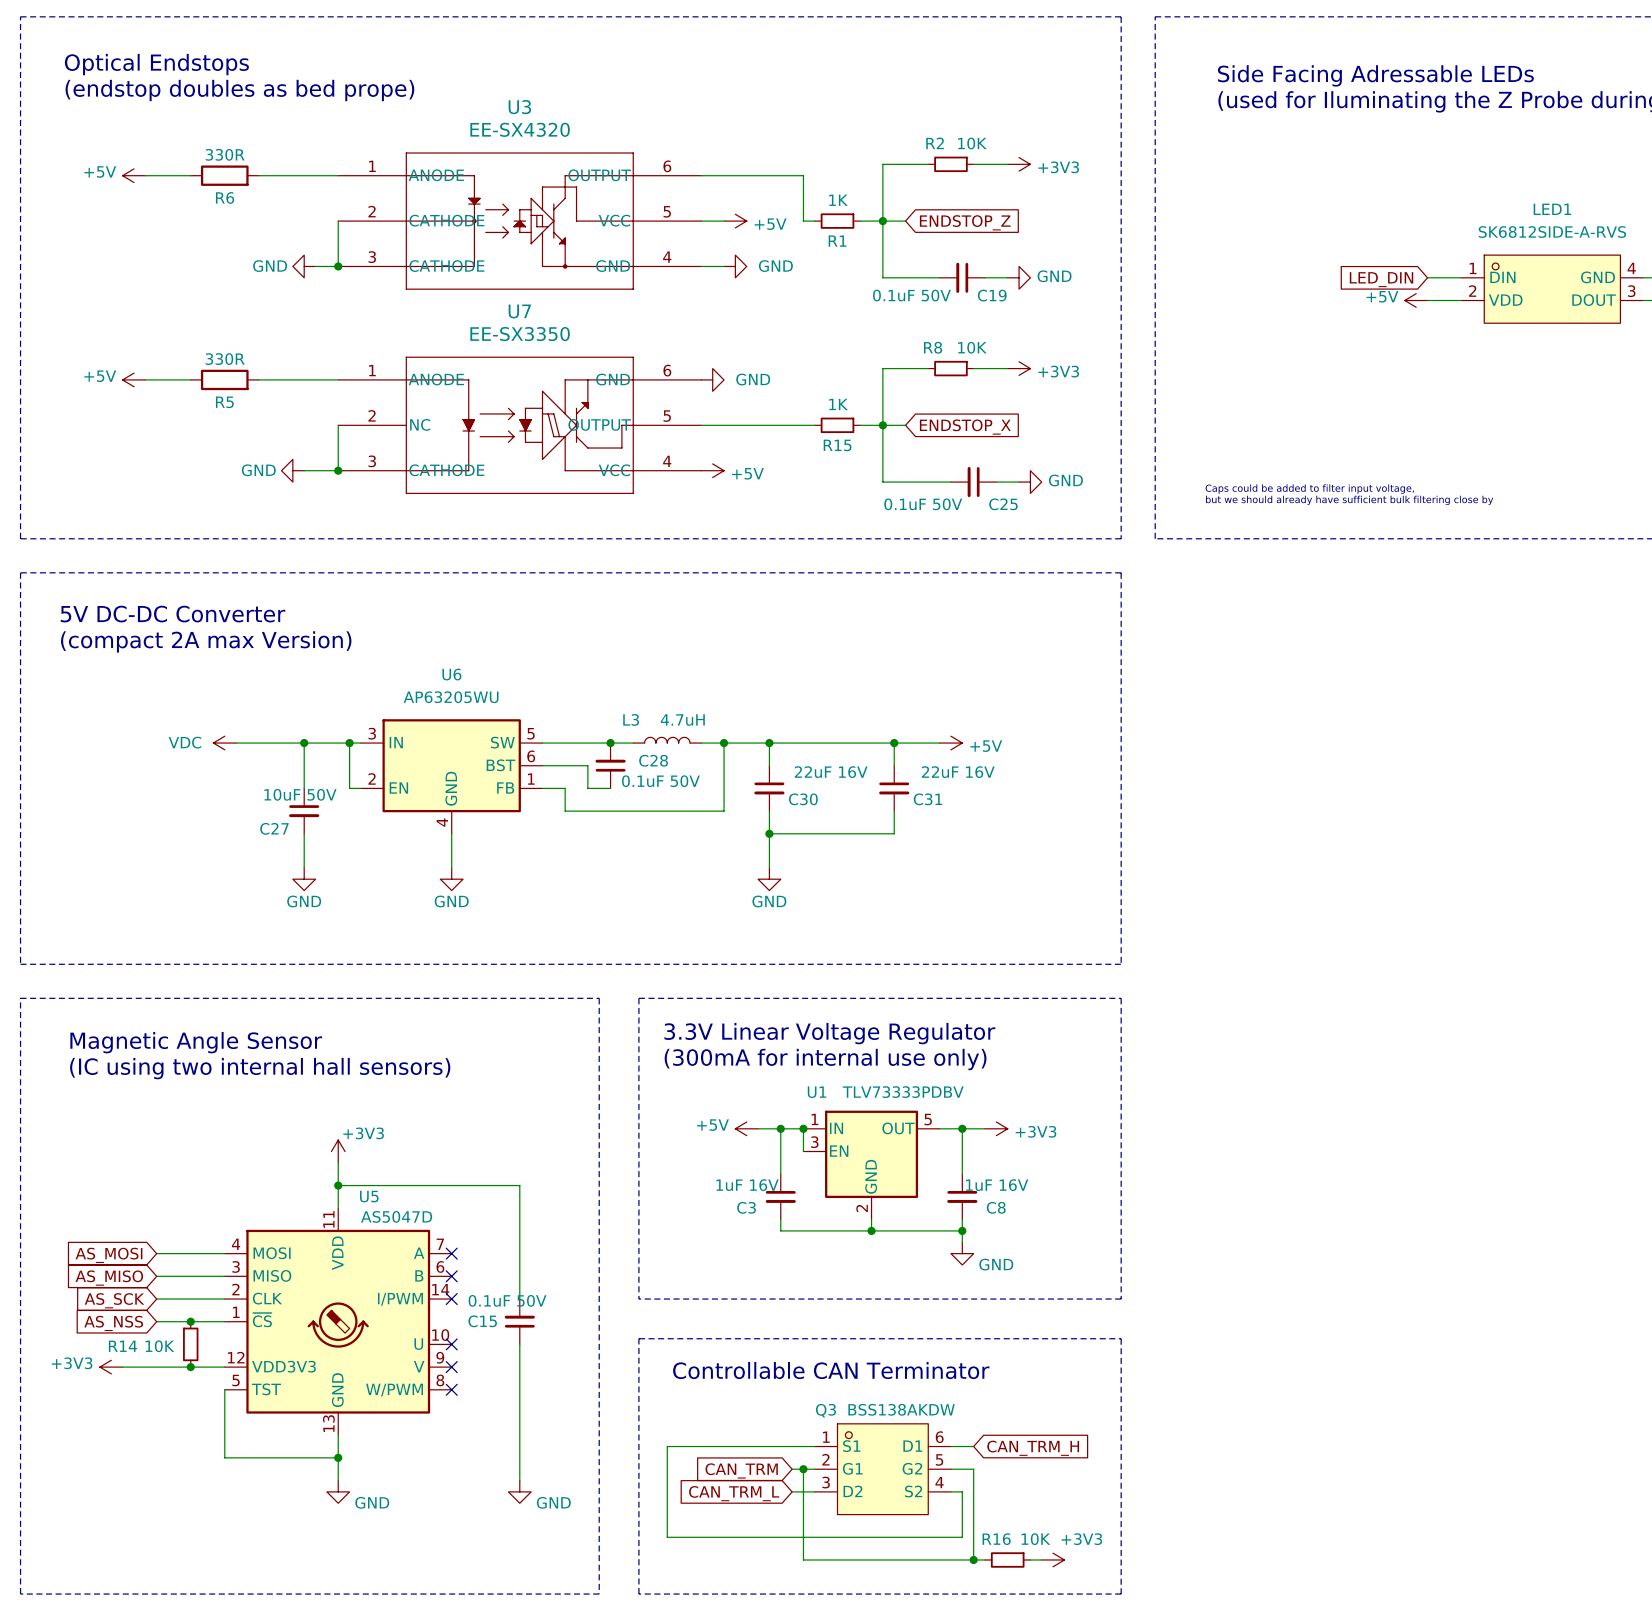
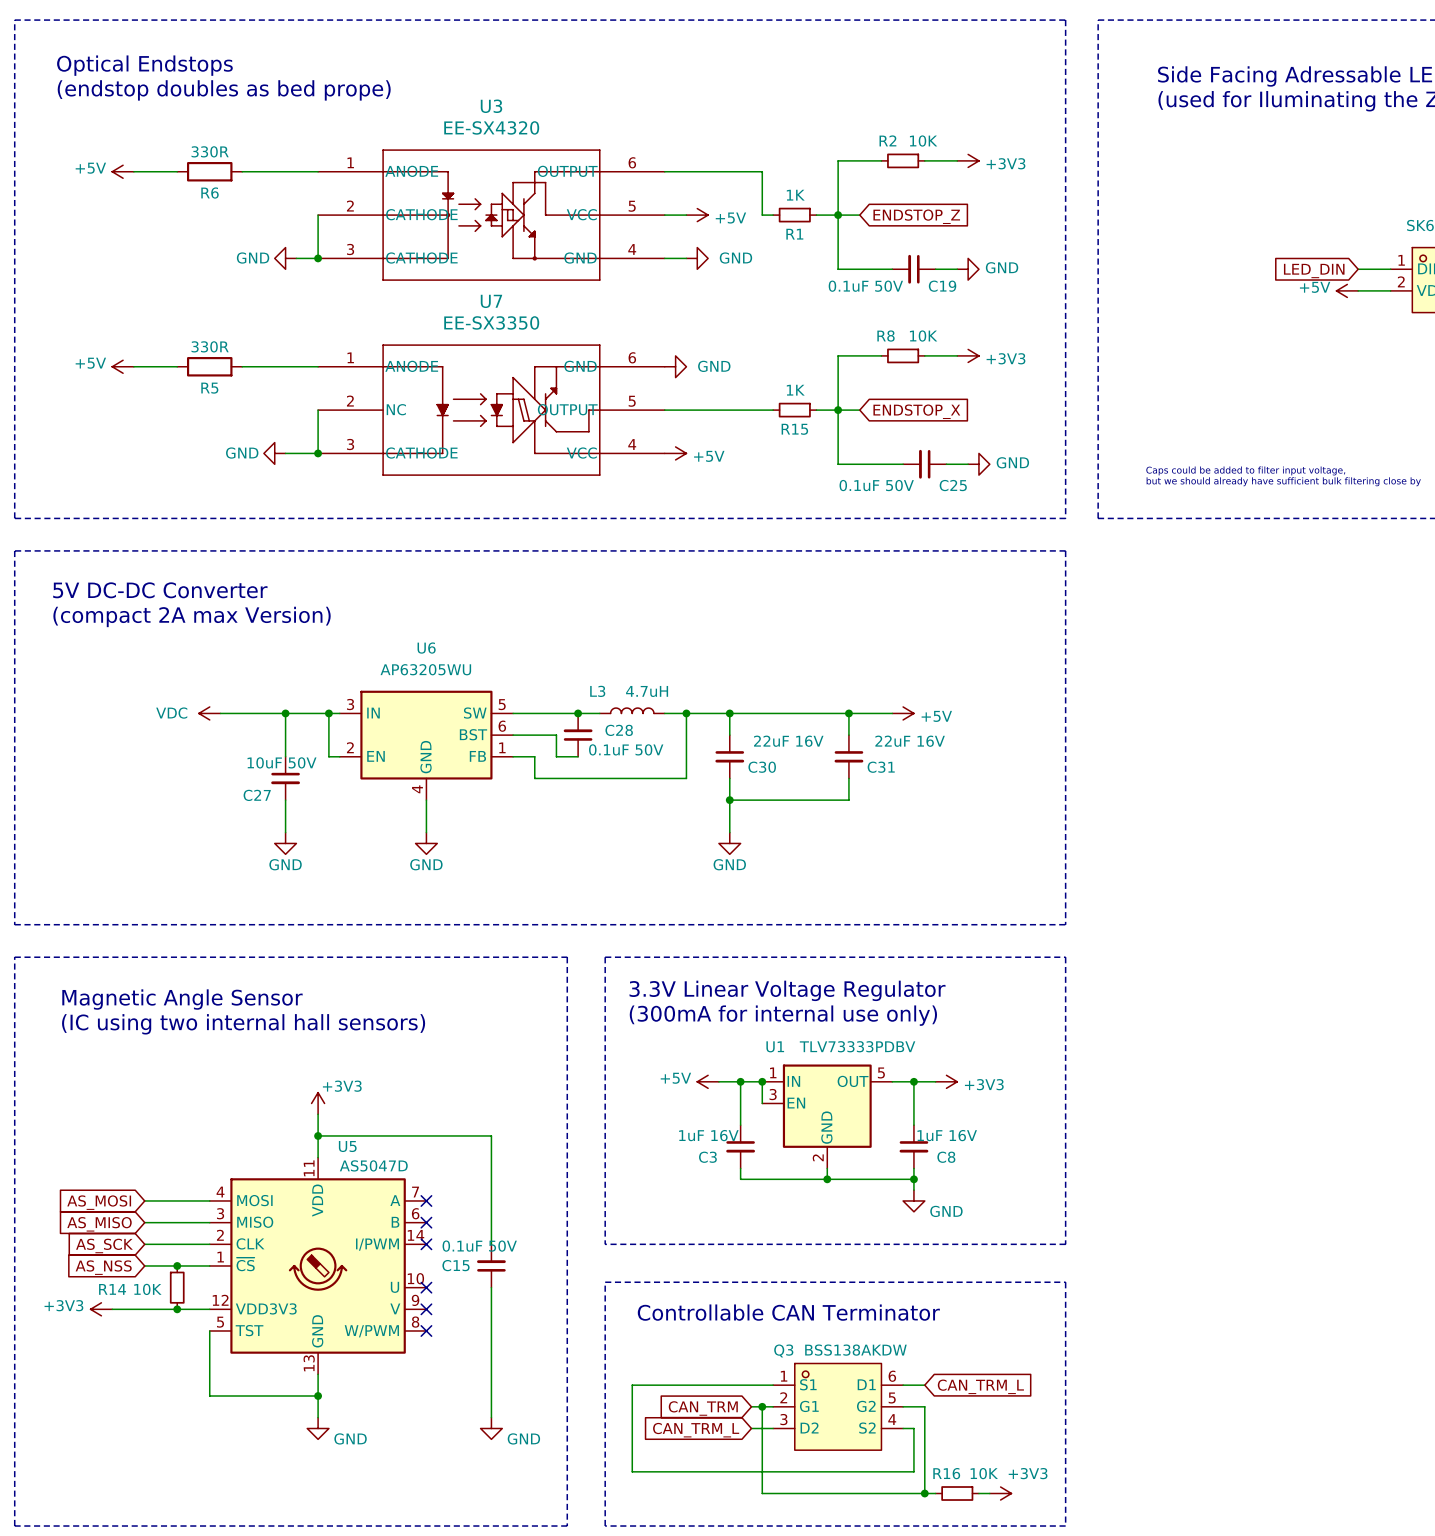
global label: CAN_TRM_H (1033, 1448) -> CAN_TRM_L (980, 1386)

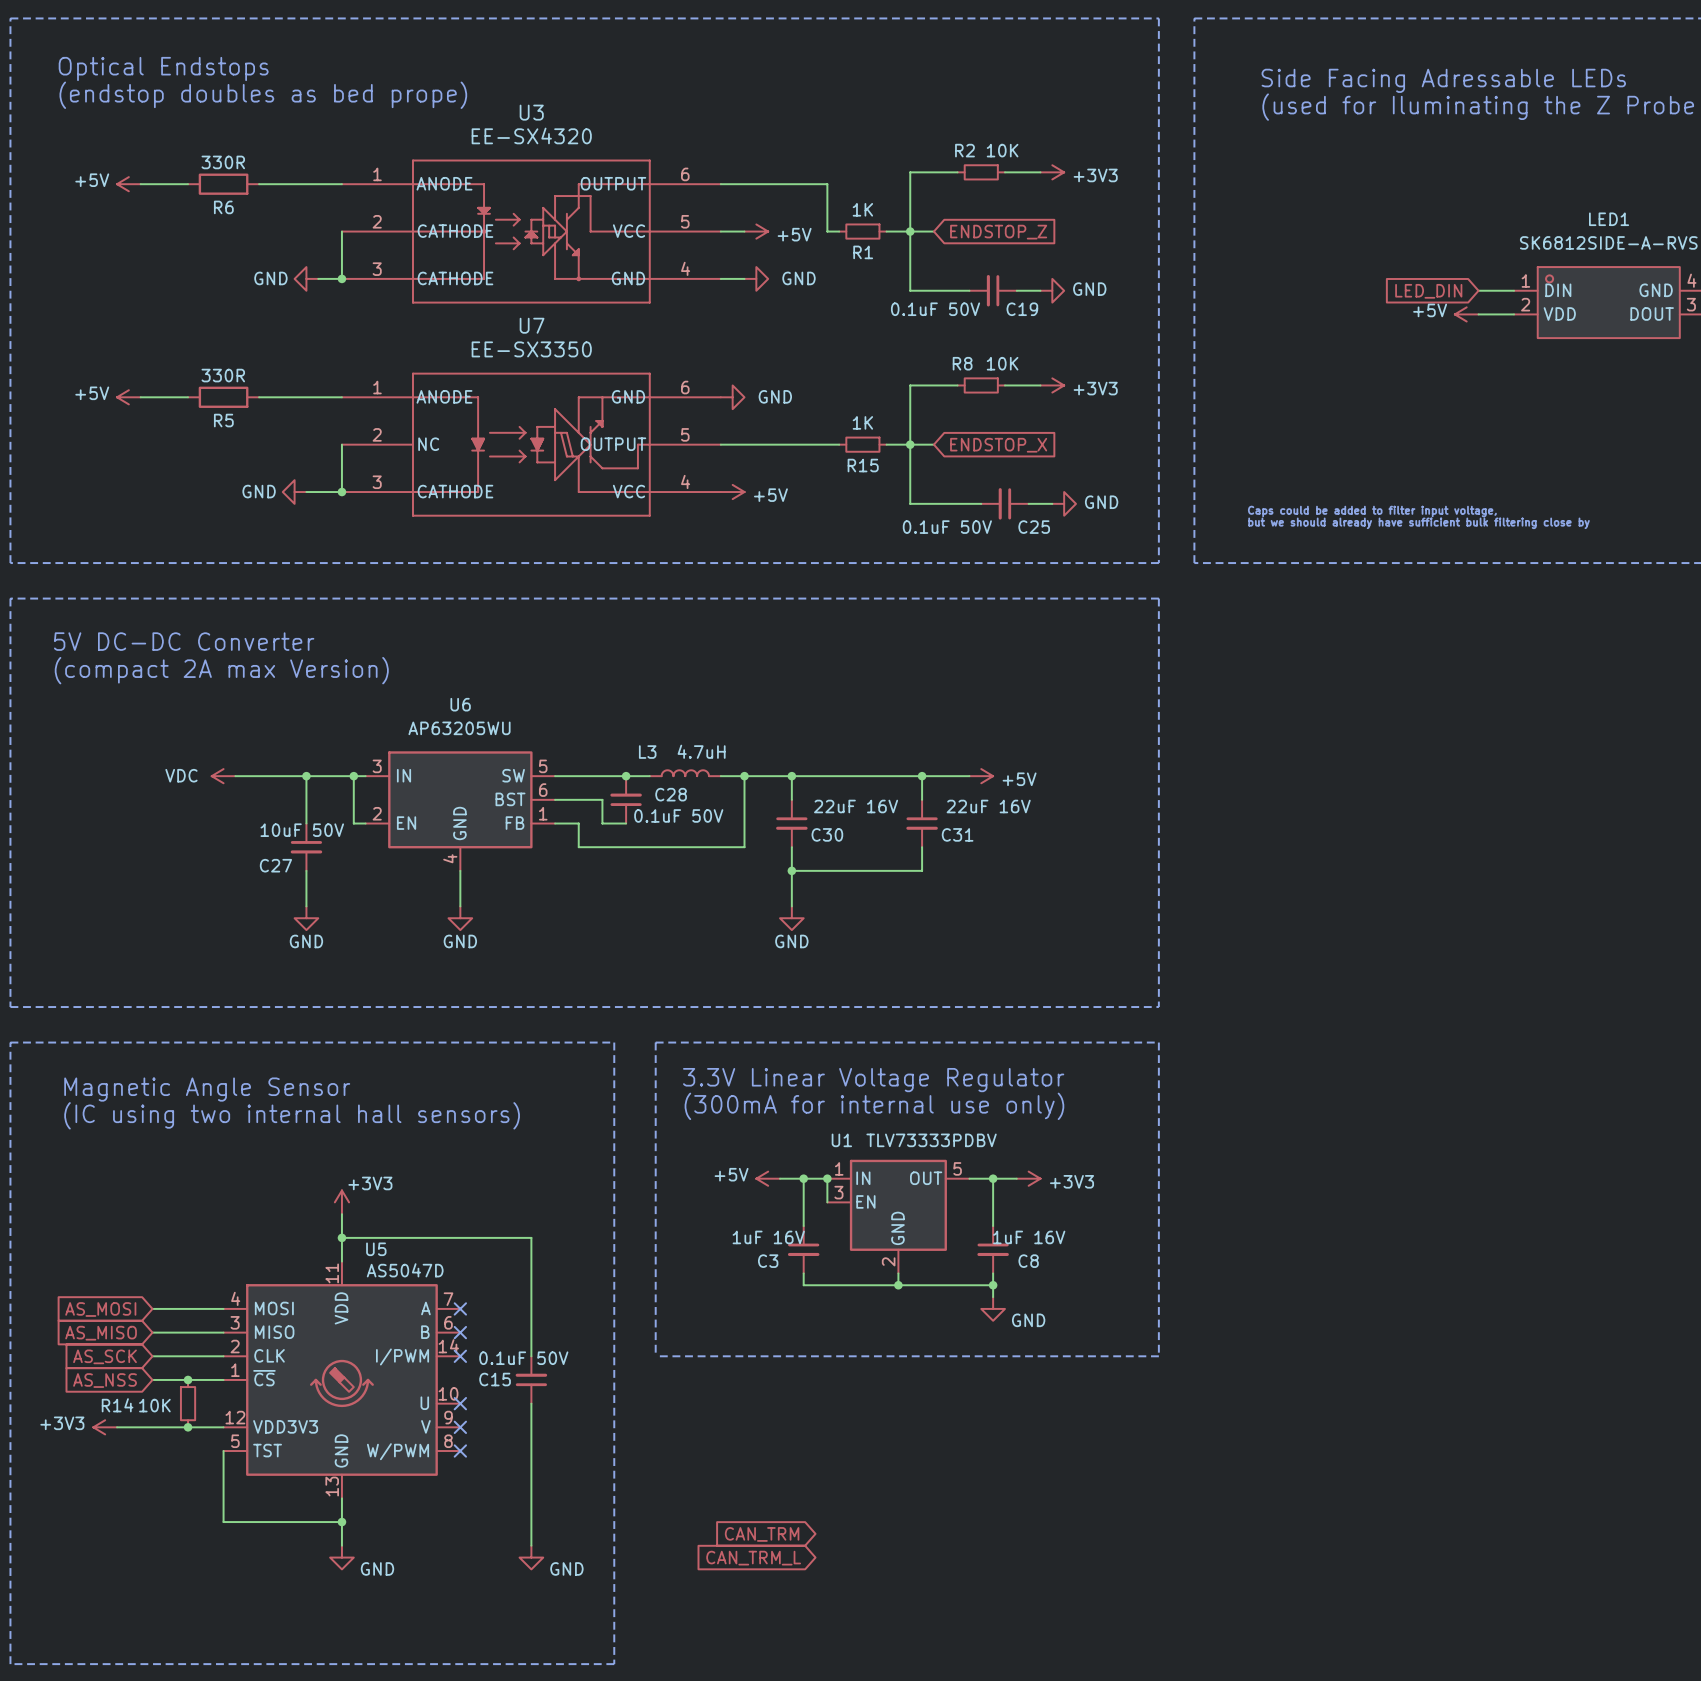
line: (605, 1282) (1065, 1282) (1065, 1526) (605, 1526) (605, 1282) -> none
text: Controllable CAN Terminator (788, 1312) -> none
wire: (773, 1385) (632, 1385) (632, 1471) (913, 1471) (913, 1428) (903, 1428) -> none
wire: (903, 1385) (924, 1385) -> none
global label: CAN_TRM_L (980, 1386) -> none
wire: (751, 1406) (773, 1406) -> none
wire: (762, 1406) (762, 1493) (935, 1493) -> none
junction: (762, 1406) -> none
Q3: BSS138AKDW (838, 1406) -> none
wire: (903, 1406) (924, 1406) (924, 1493) -> none
wire: (751, 1428) (773, 1428) -> none
junction: (924, 1493) -> none
R16: 10K (957, 1493) -> none
wire: (978, 1493) (989, 1493) -> none
power symbol: +3V3 (1000, 1493) -> none

